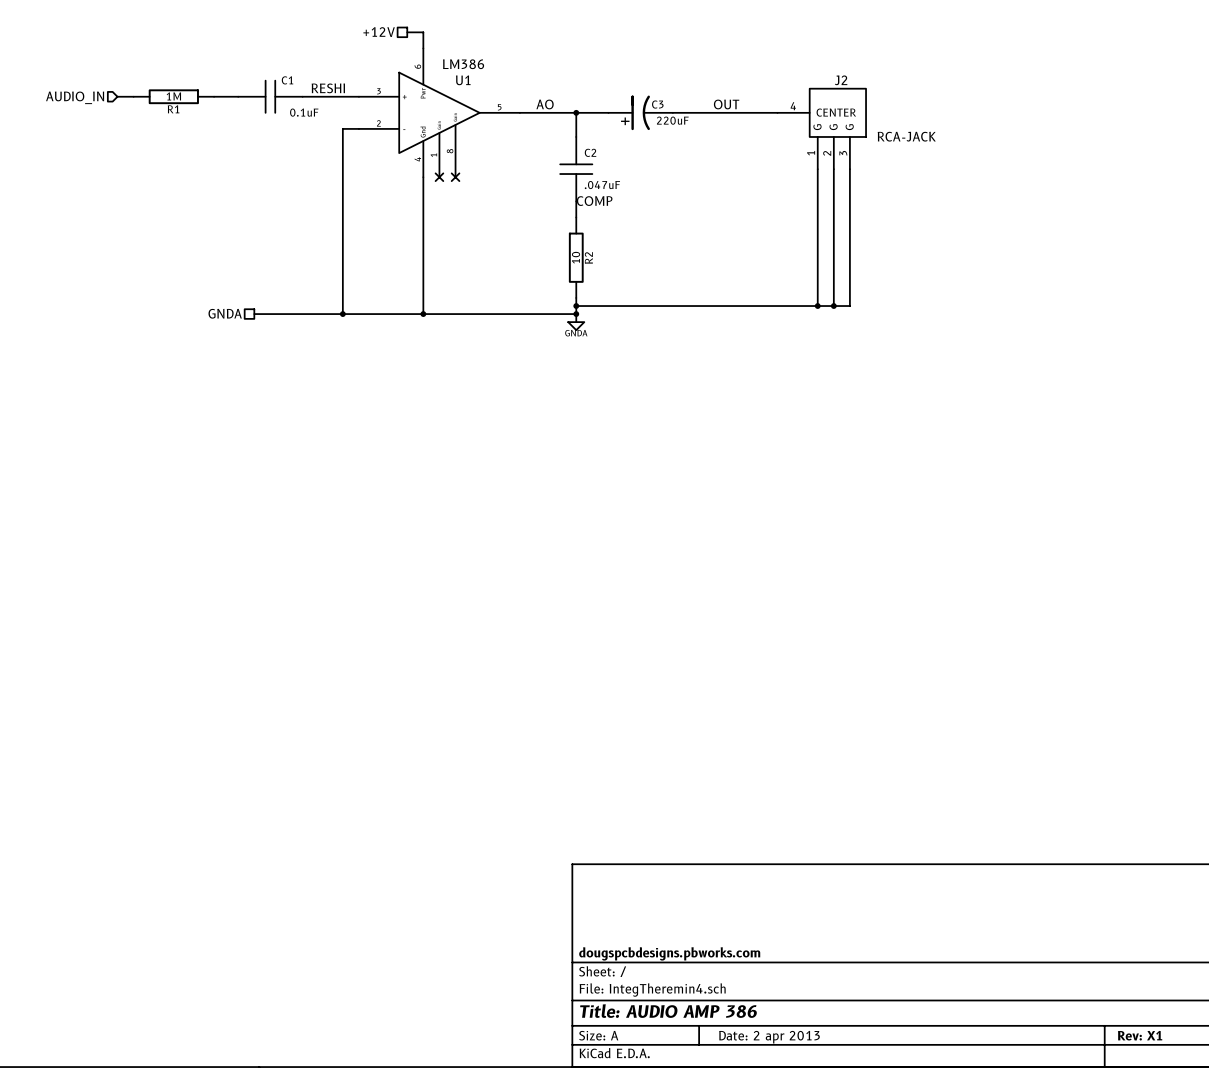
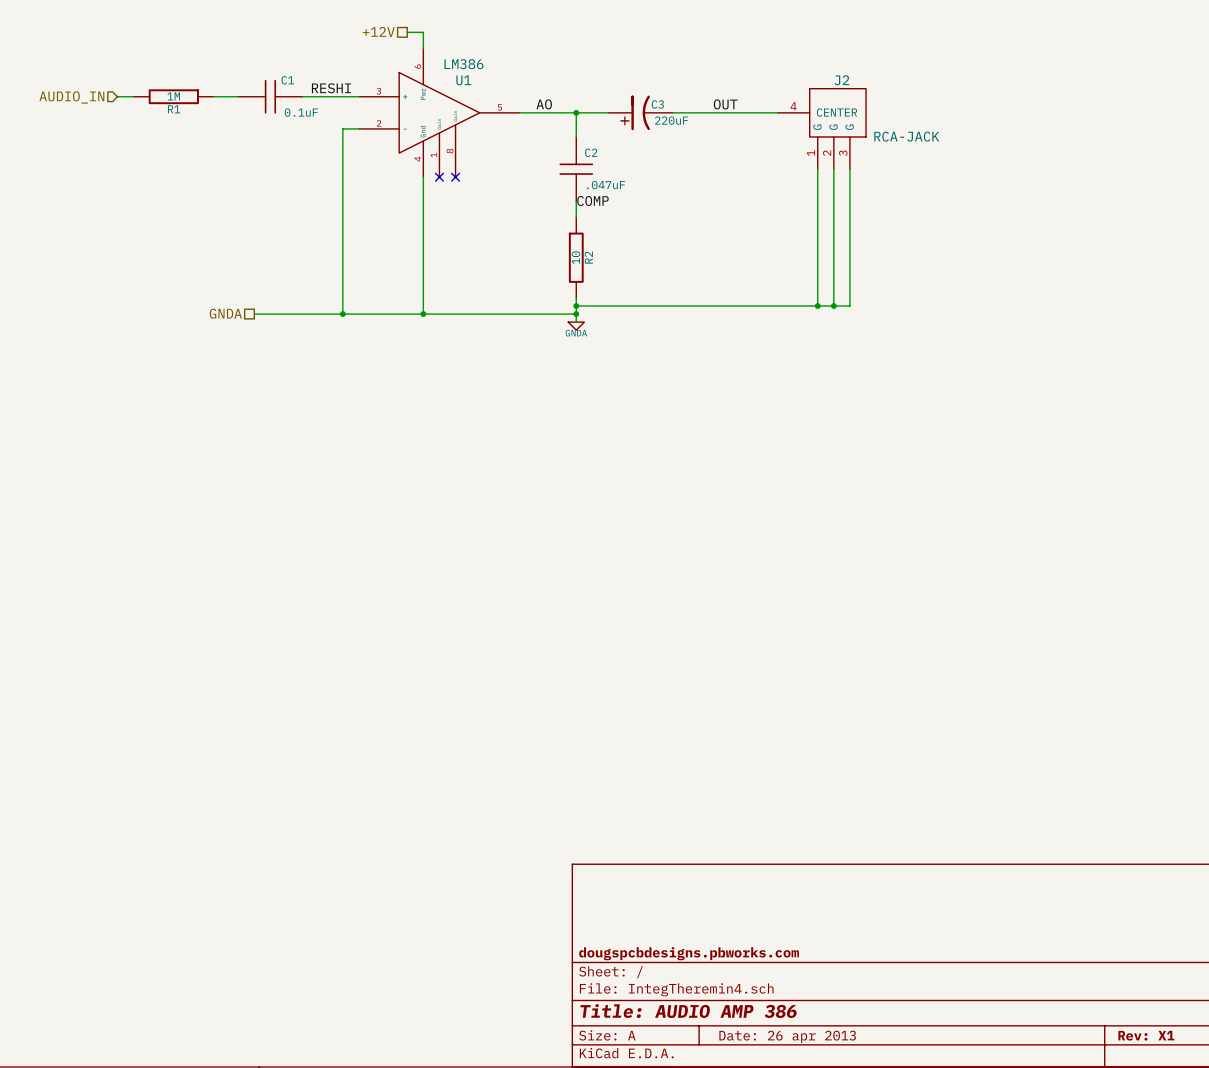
title block: Date: 2 apr 2013 (769, 1037) -> Date: 26 apr 2013 (787, 1036)

